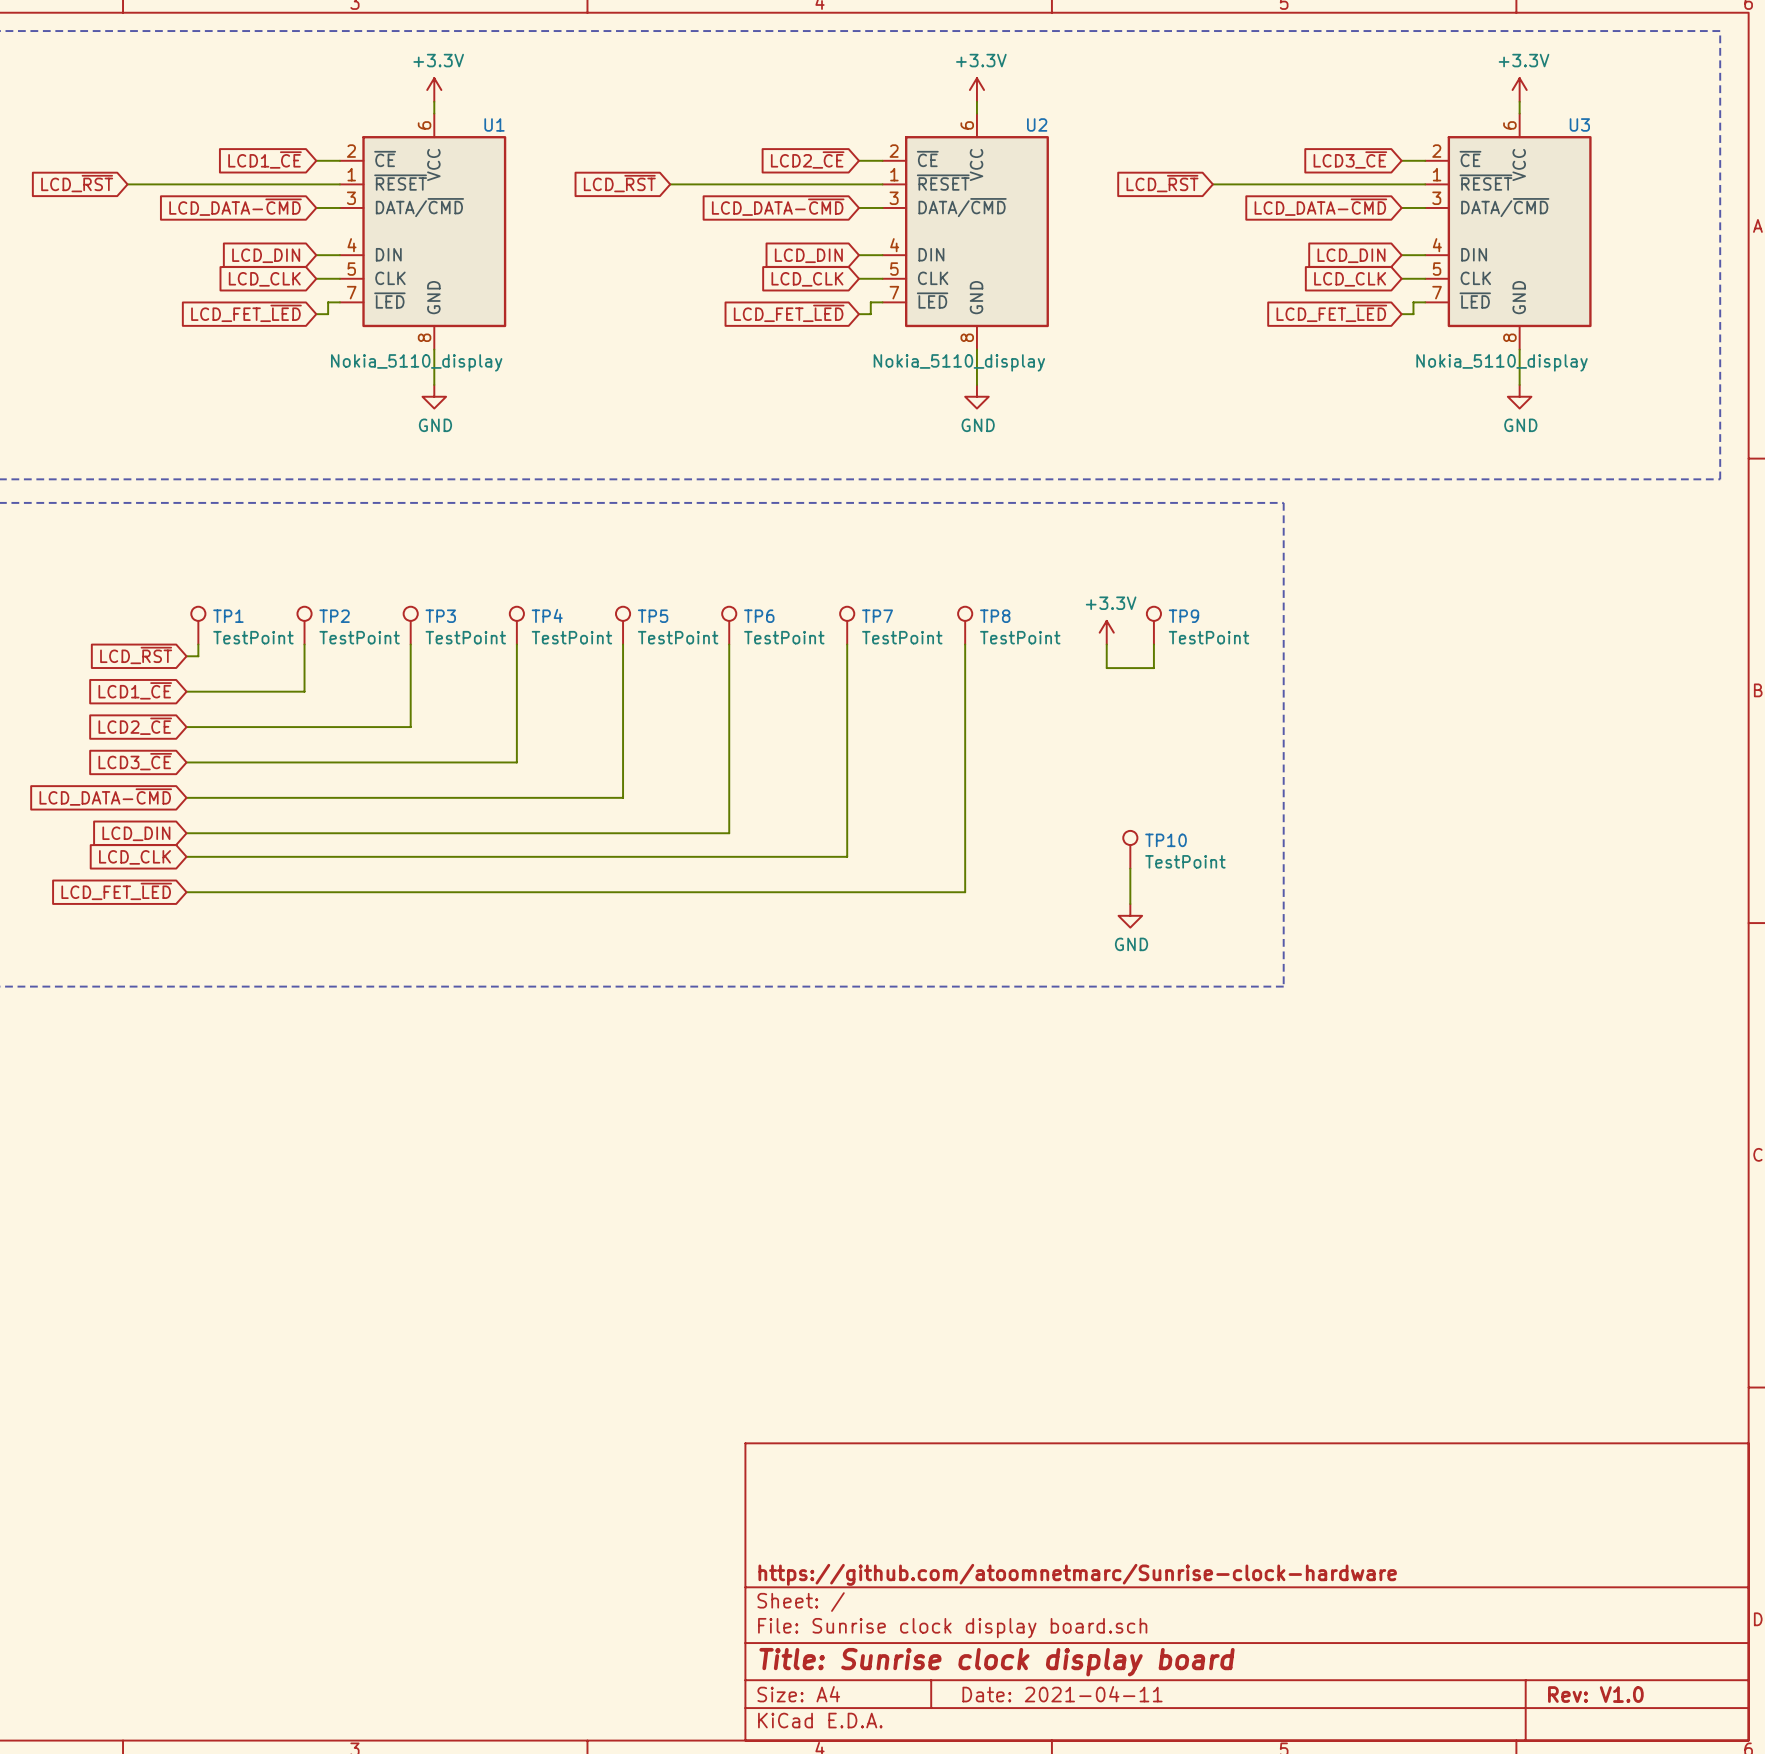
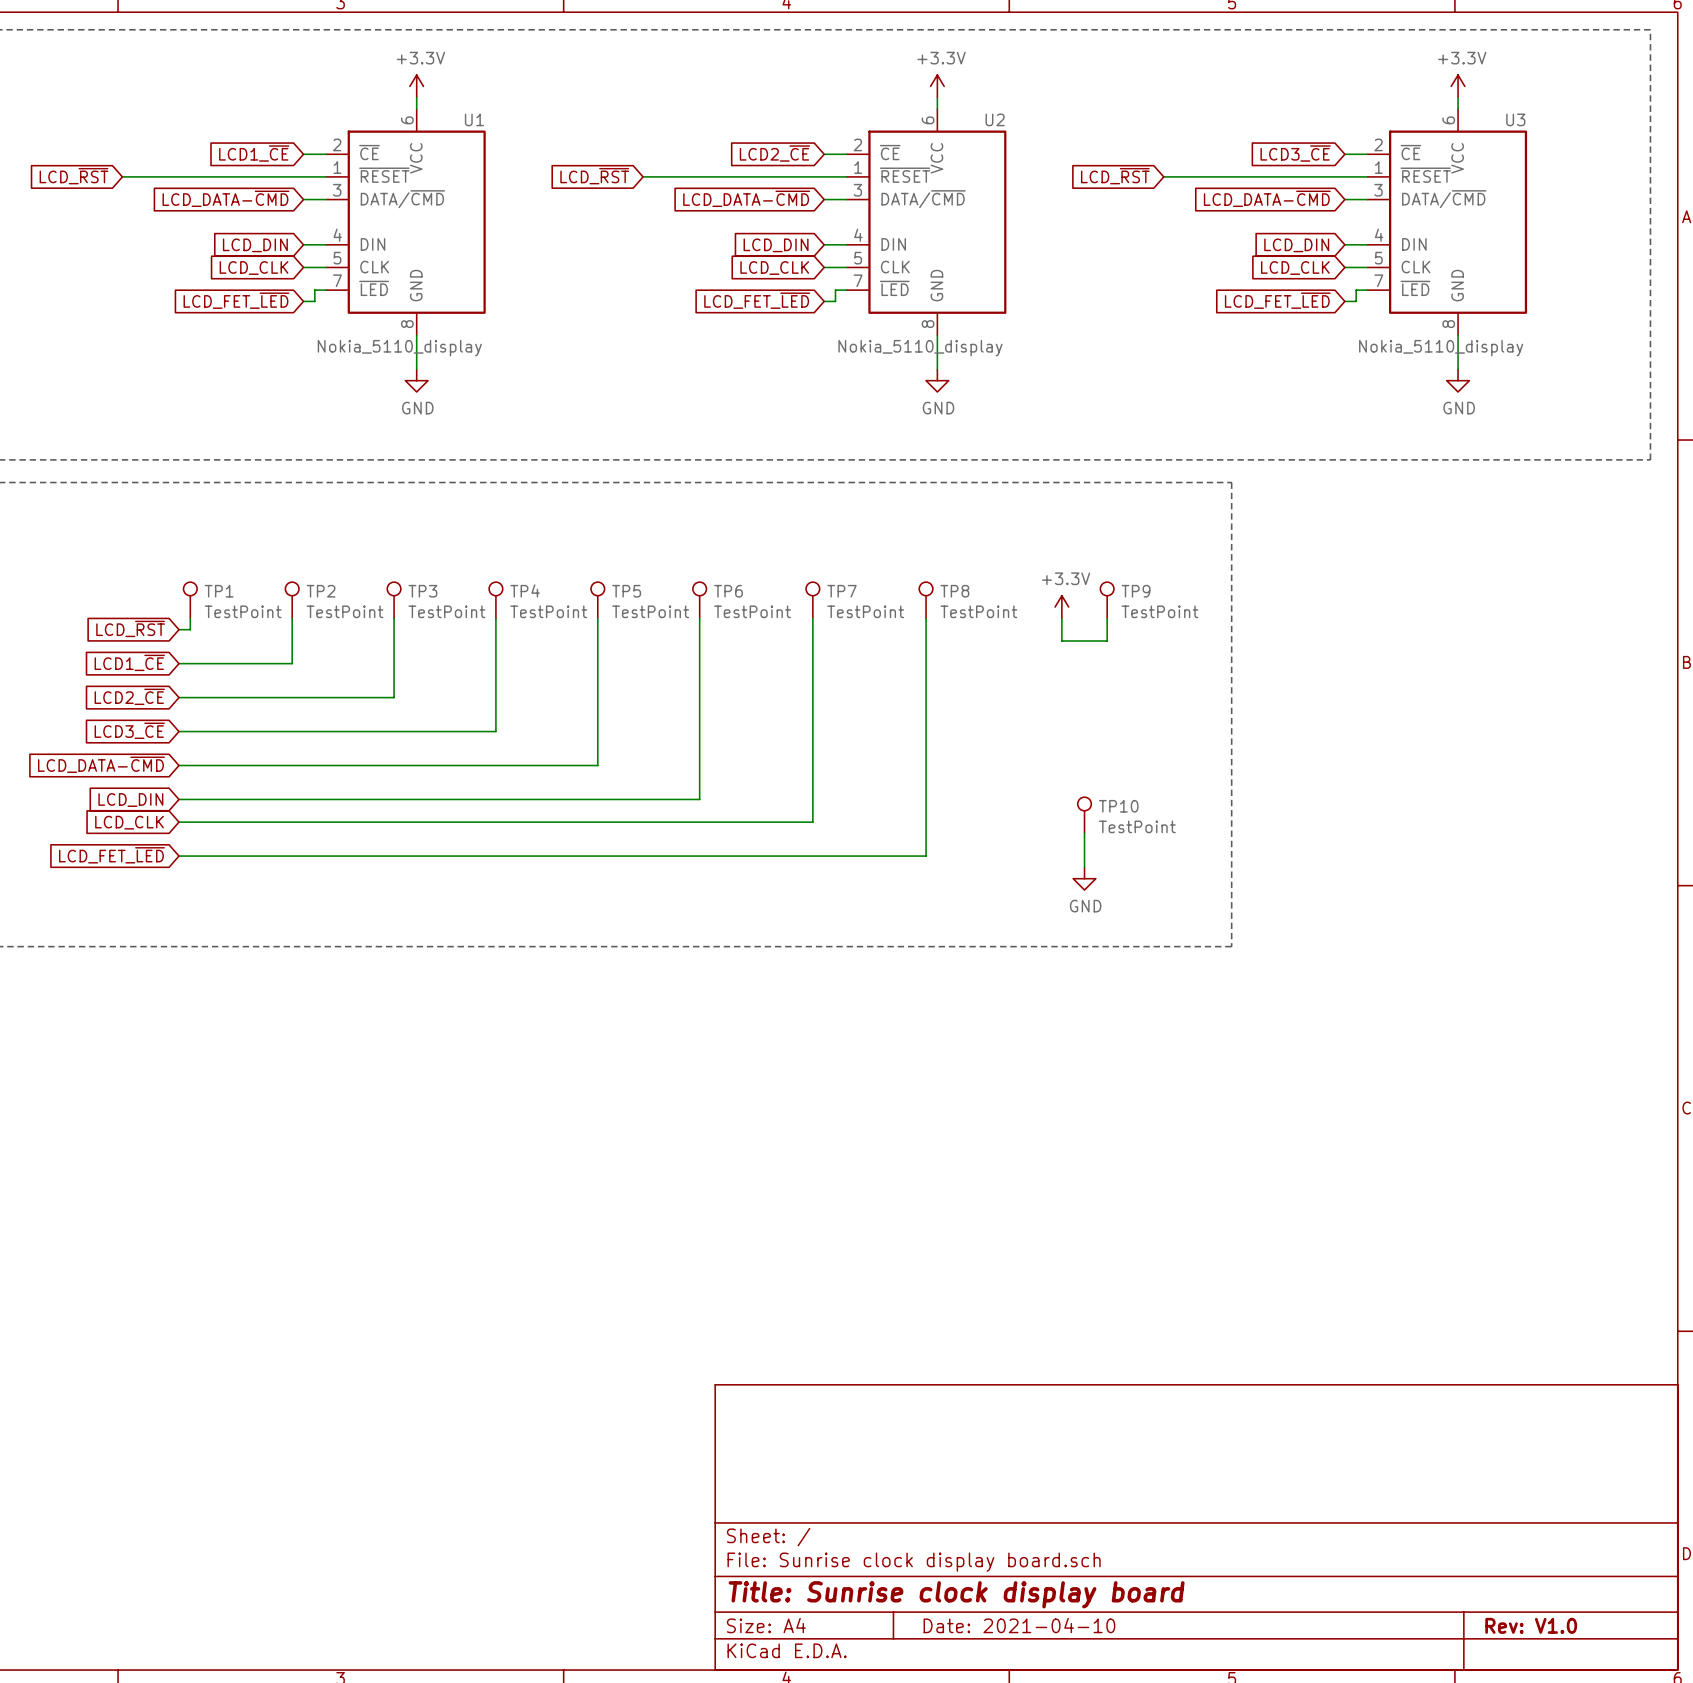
title block: https://github.com/atoomnetmarc/Sunrise-clock-hardware (1077, 1574) -> none
title block: Date: 2021-04-11 (1062, 1694) -> Date: 2021-04-10 (1019, 1625)

